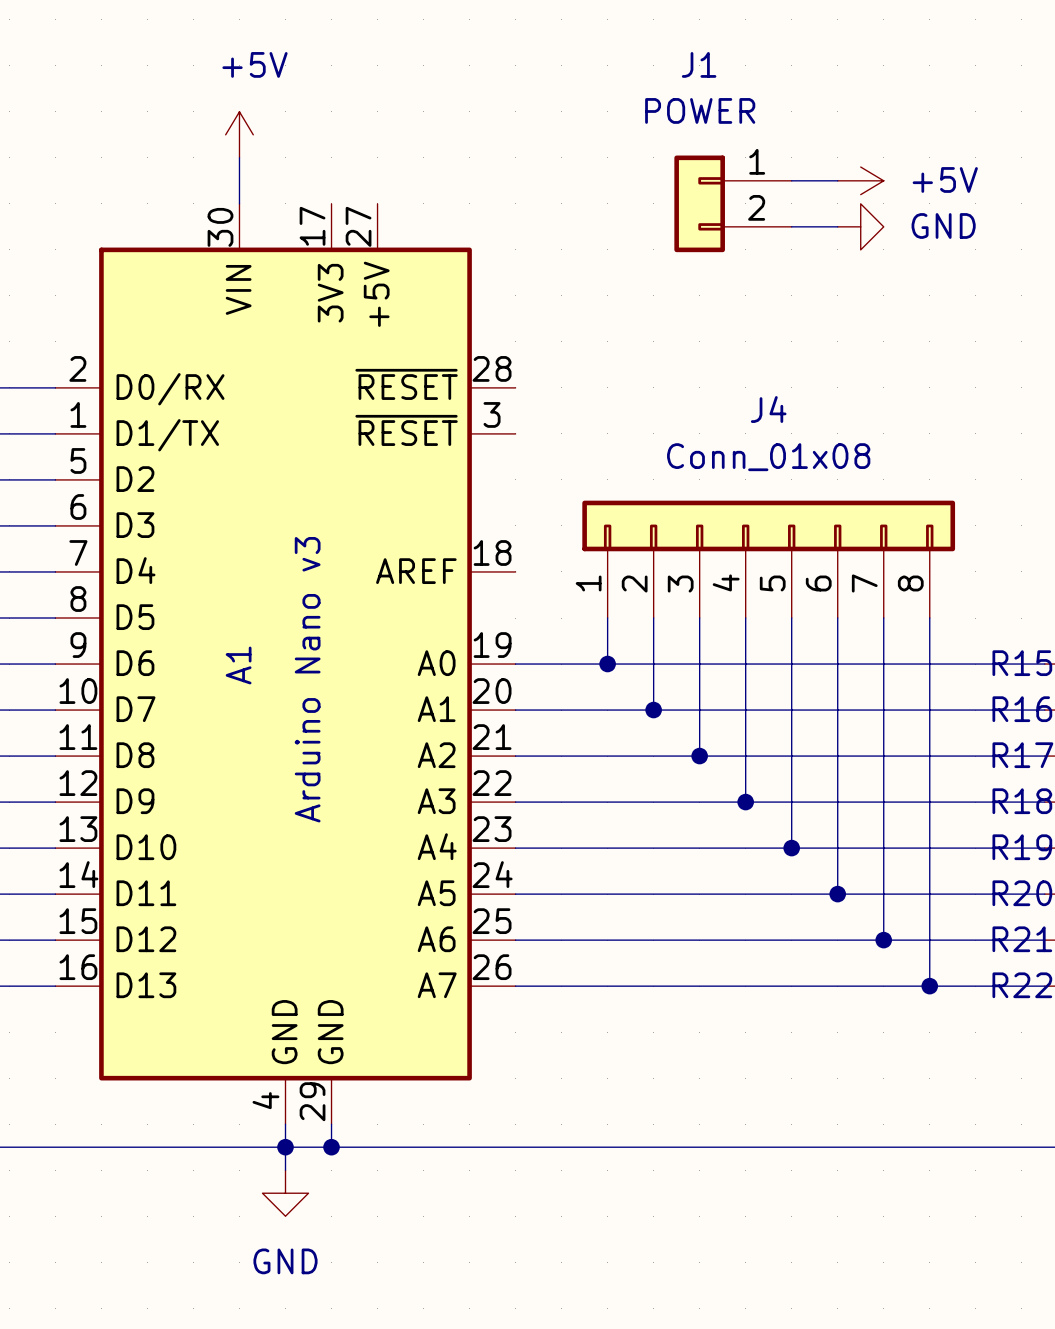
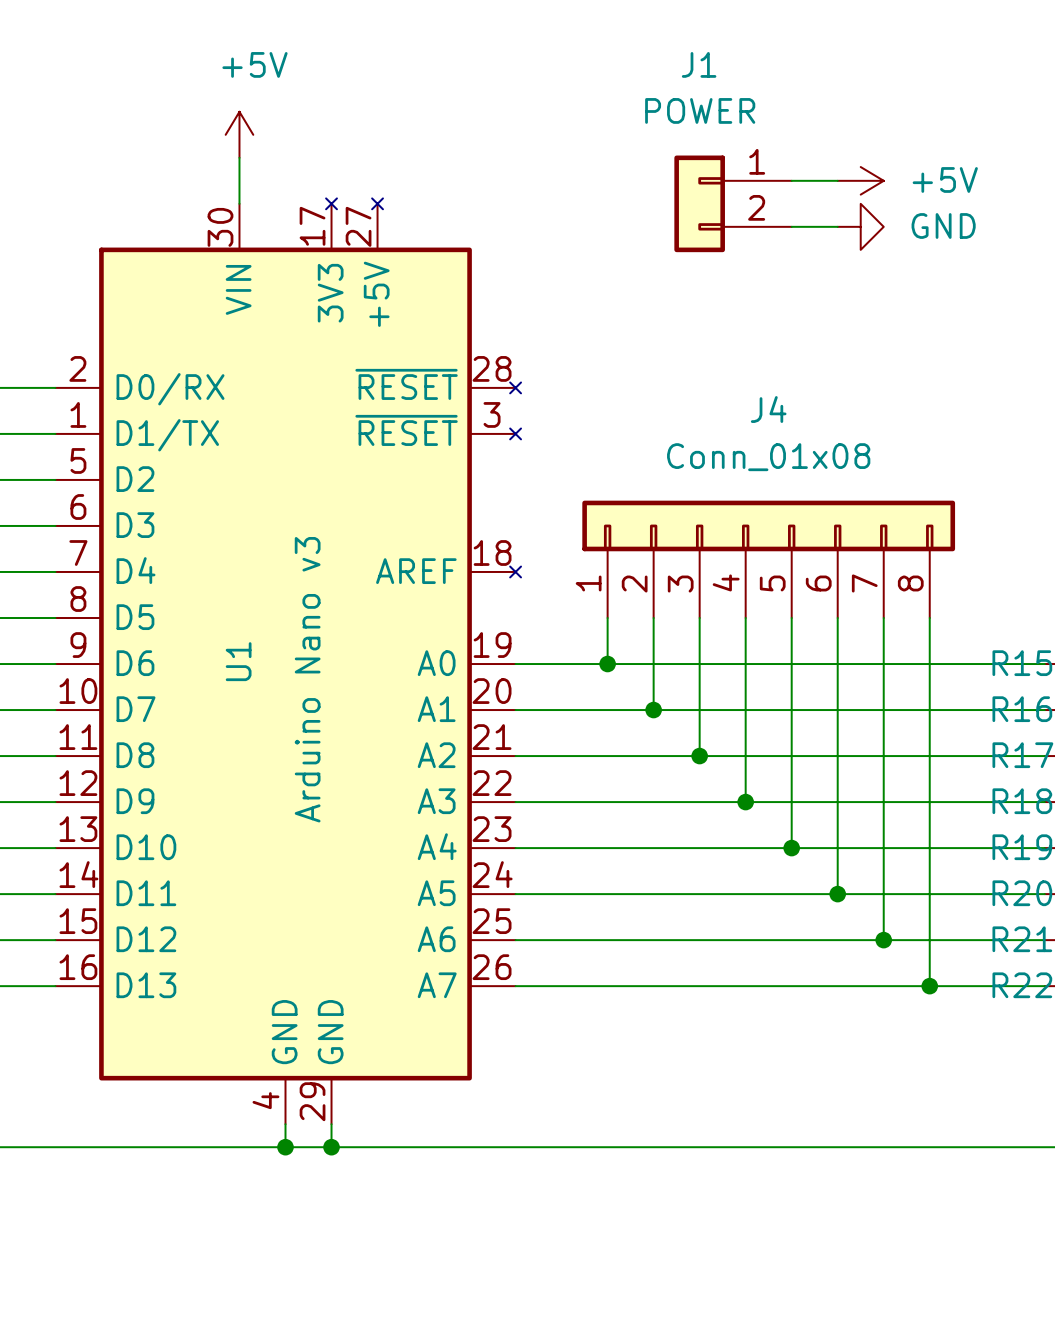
U1: none -> Arduino Nano v3 (288, 661)
A1: Arduino Nano v3 (285, 664) -> none
wire: (285, 1147) (285, 1170) -> none
power symbol: GND (285, 1193) -> none

